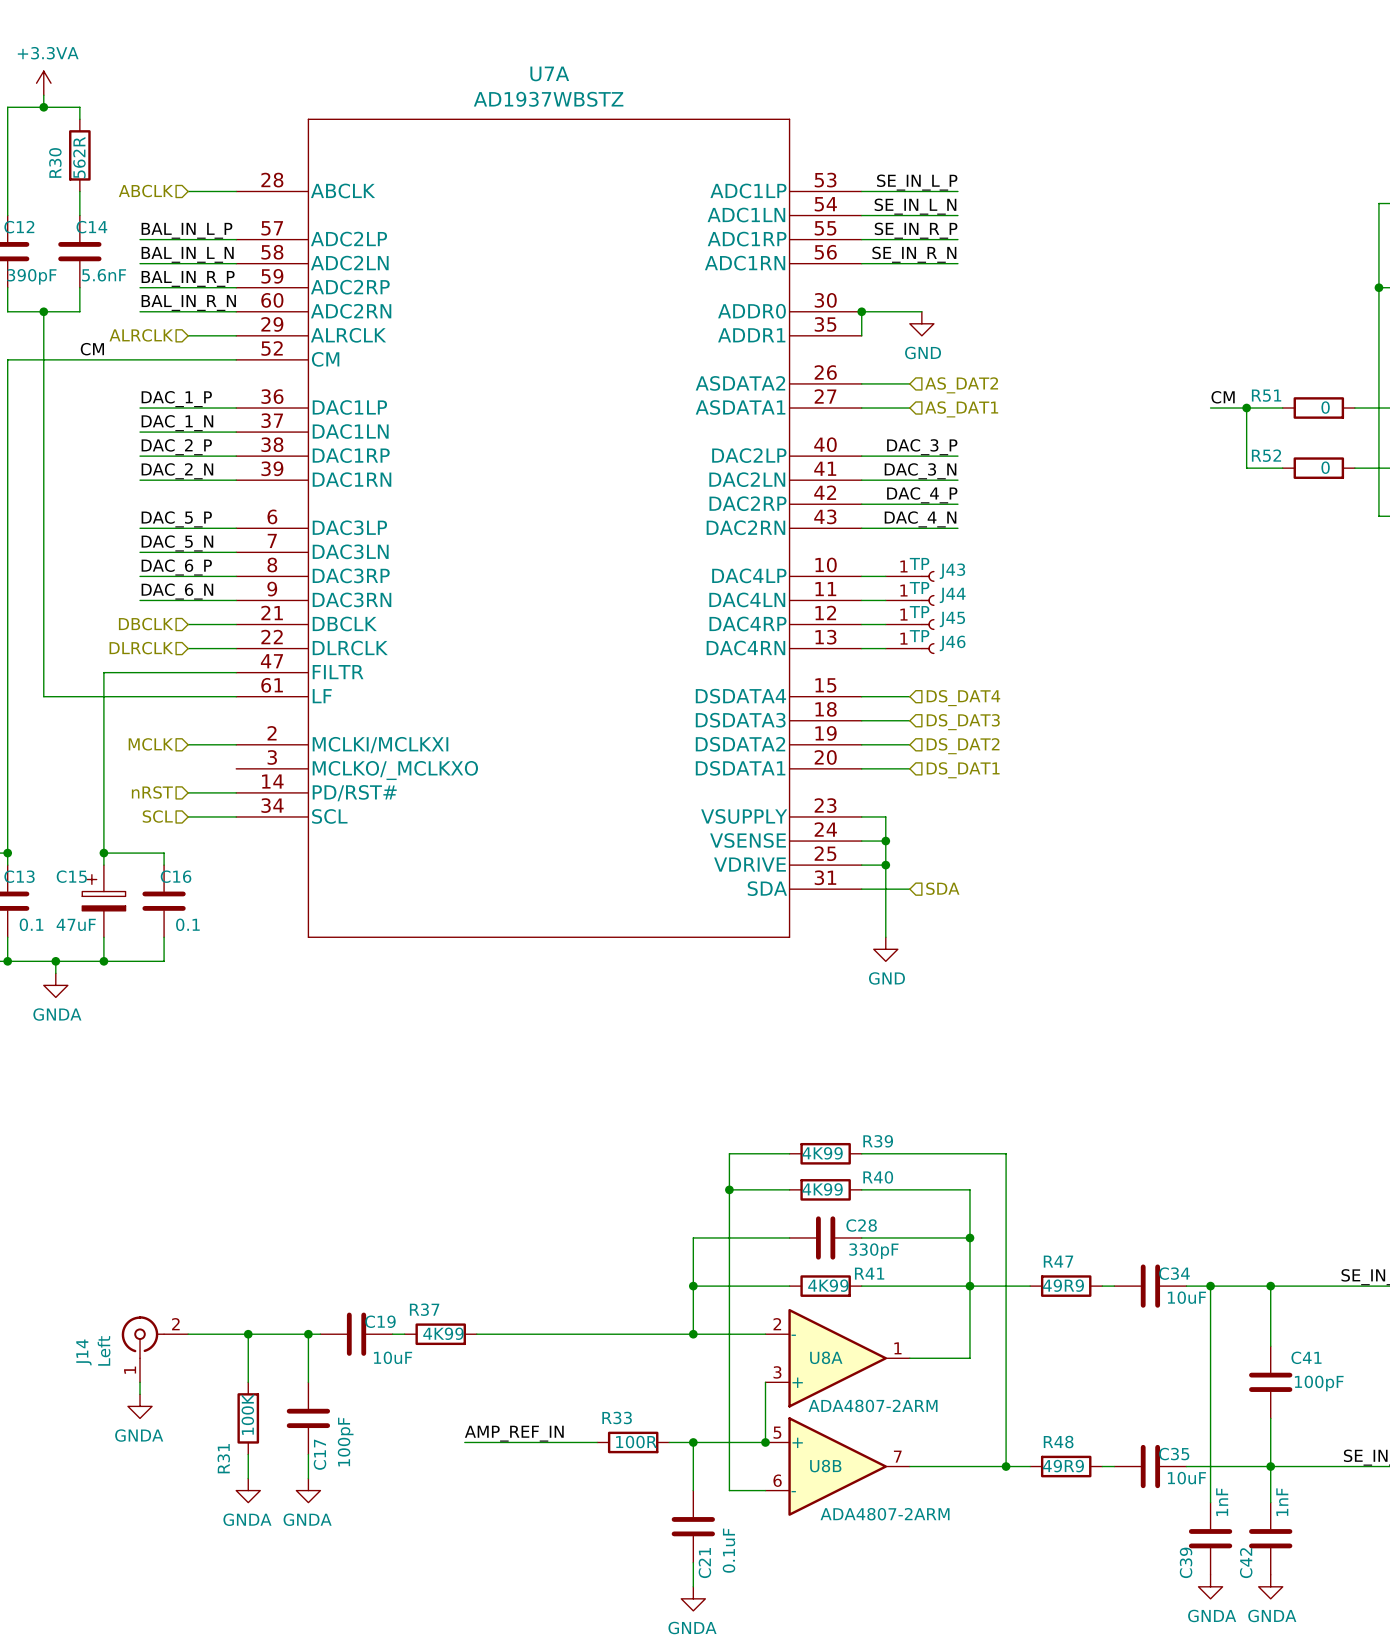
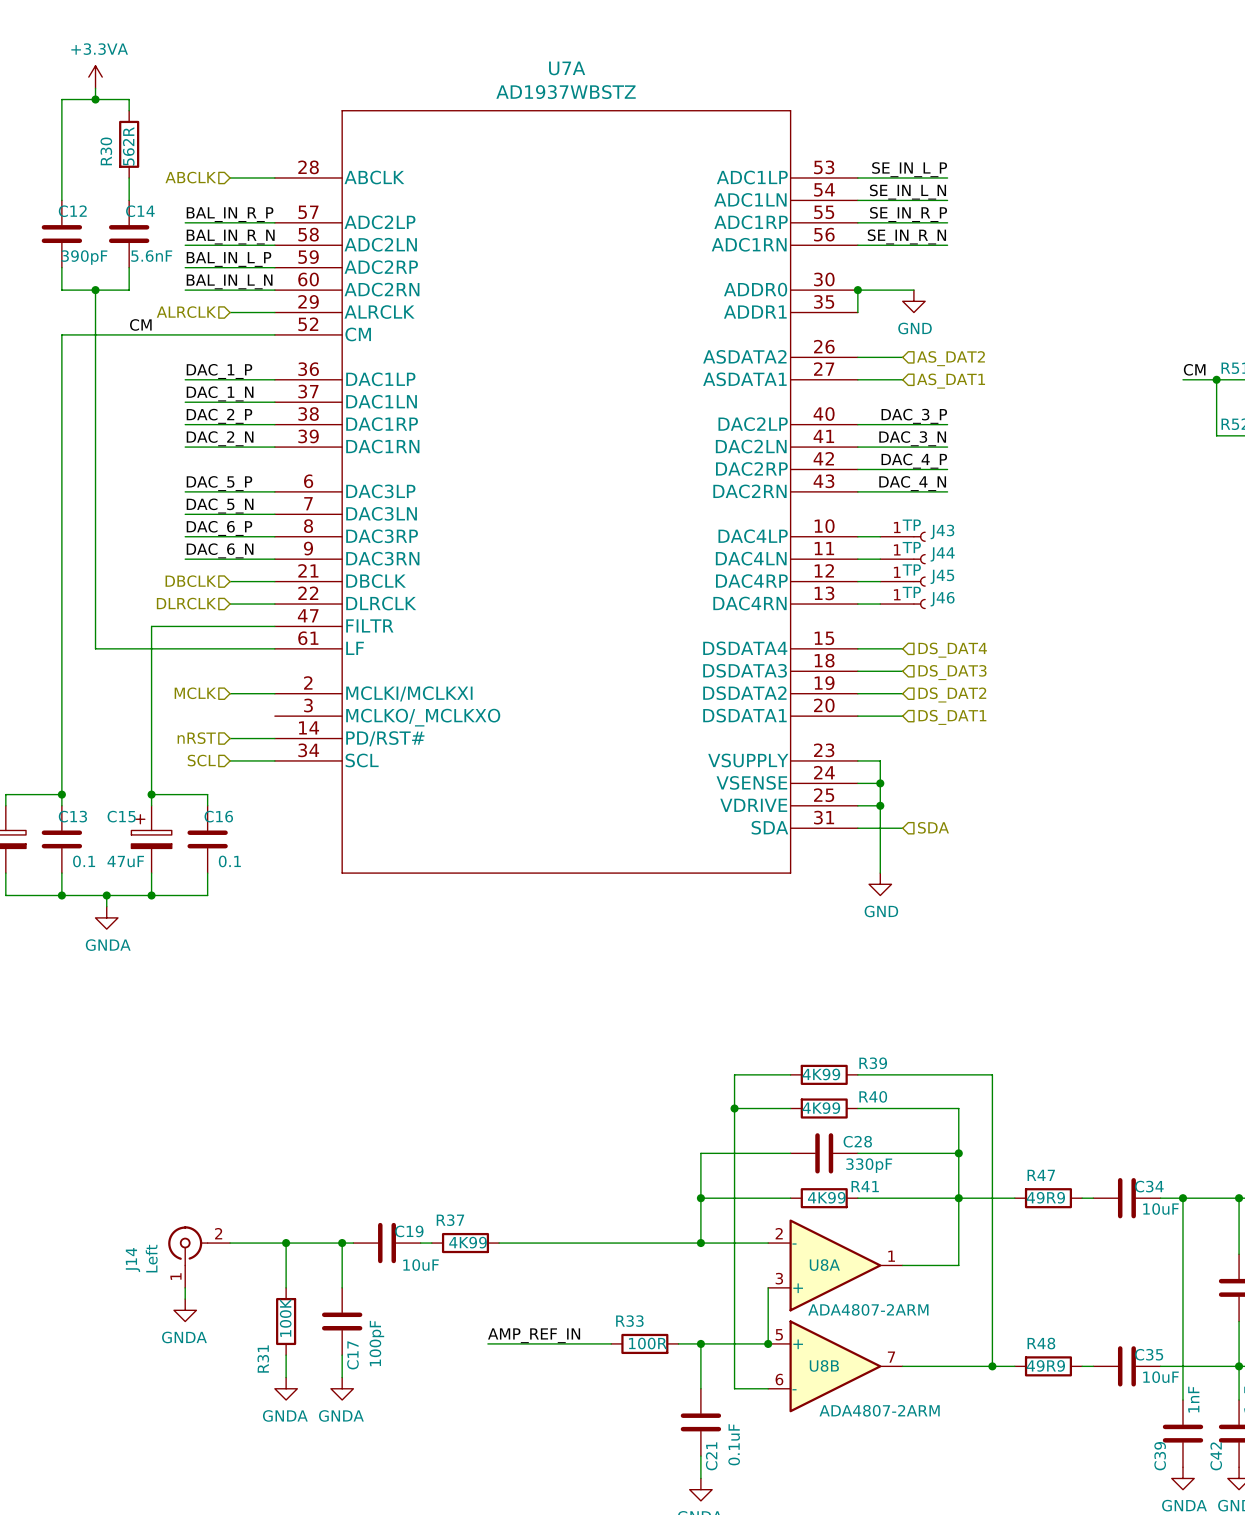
label: BAL_IN_L_P (186, 230) -> BAL_IN_R_P (230, 214)
label: BAL_IN_L_N (187, 254) -> BAL_IN_R_N (230, 237)
label: BAL_IN_R_P (188, 278) -> BAL_IN_L_P (228, 259)
label: BAL_IN_R_N (188, 302) -> BAL_IN_L_N (229, 281)

